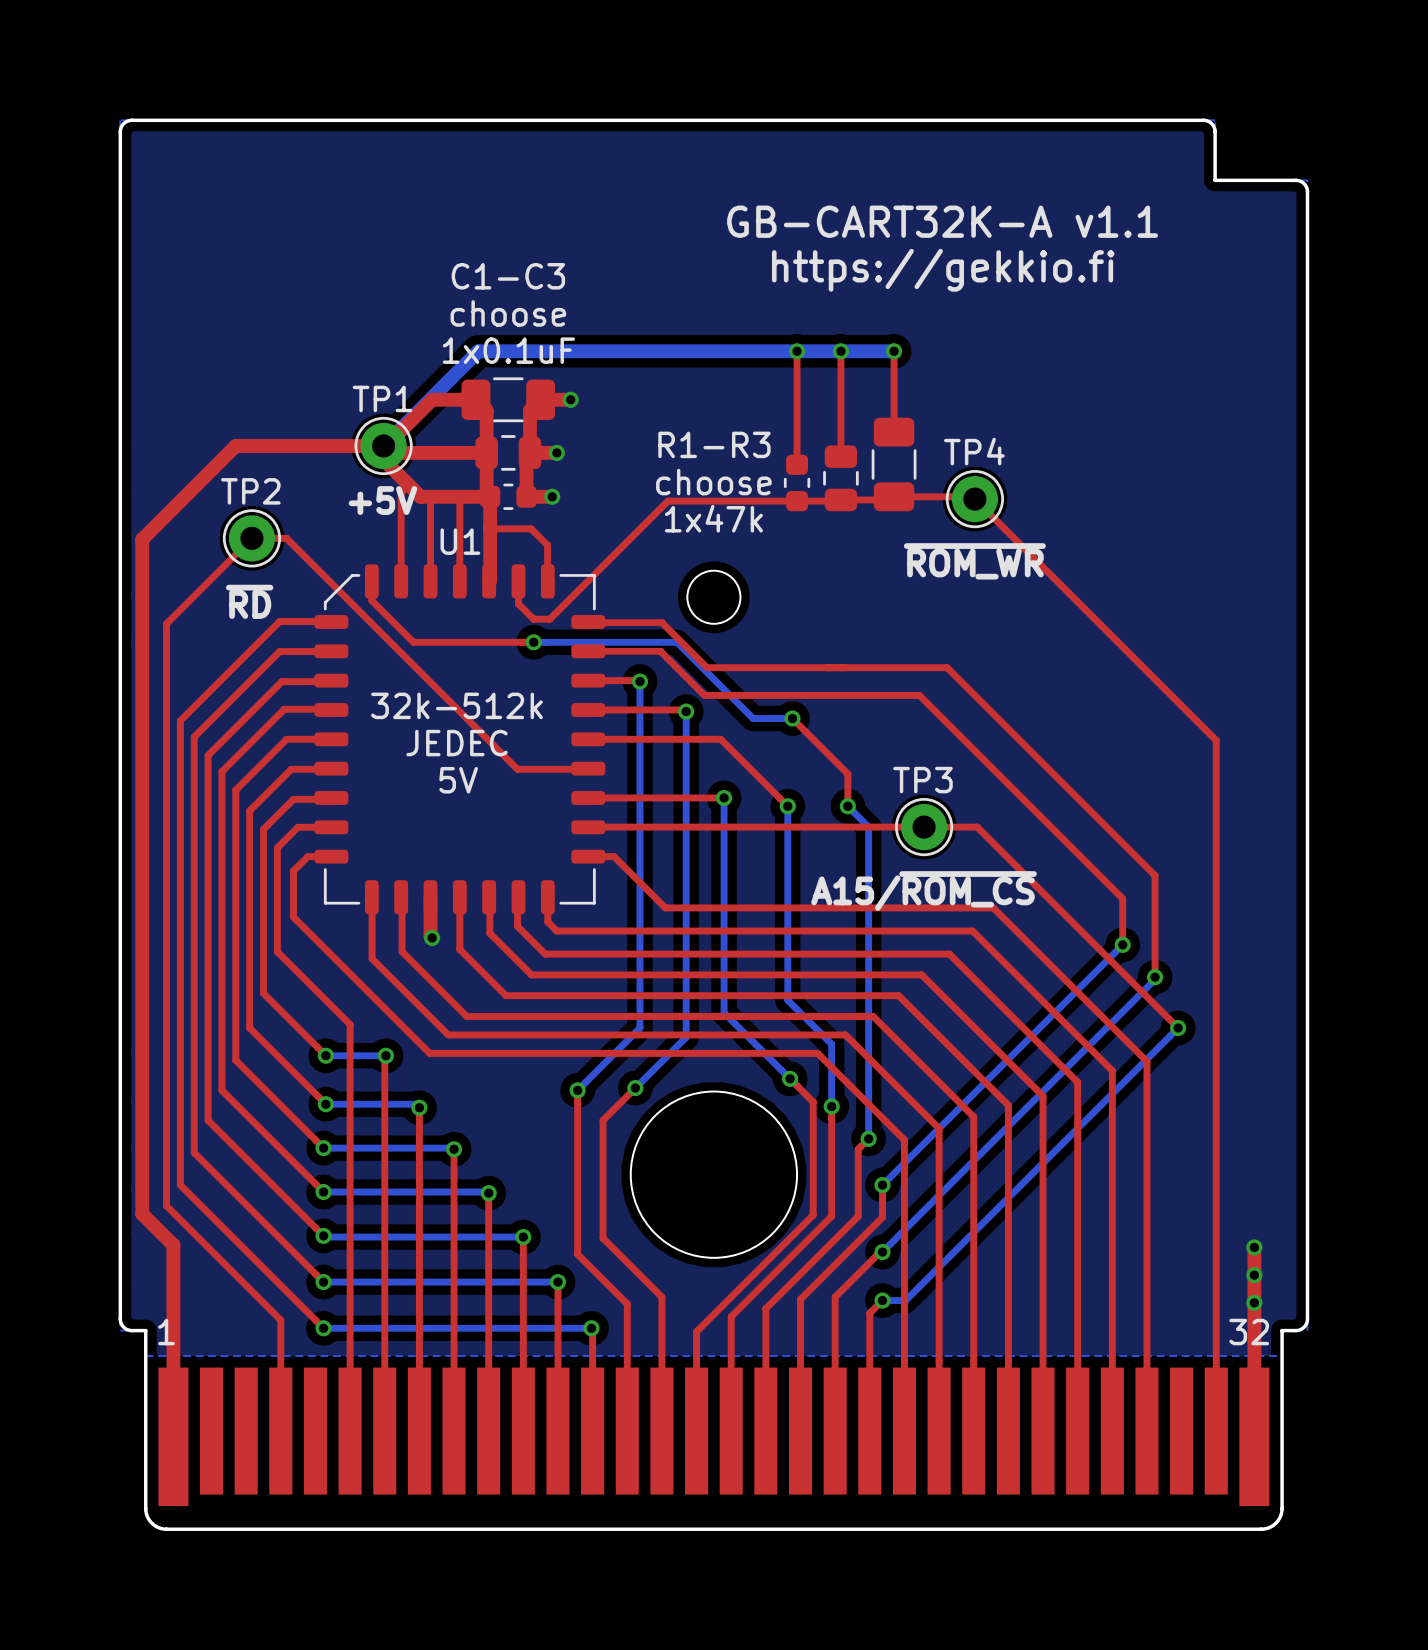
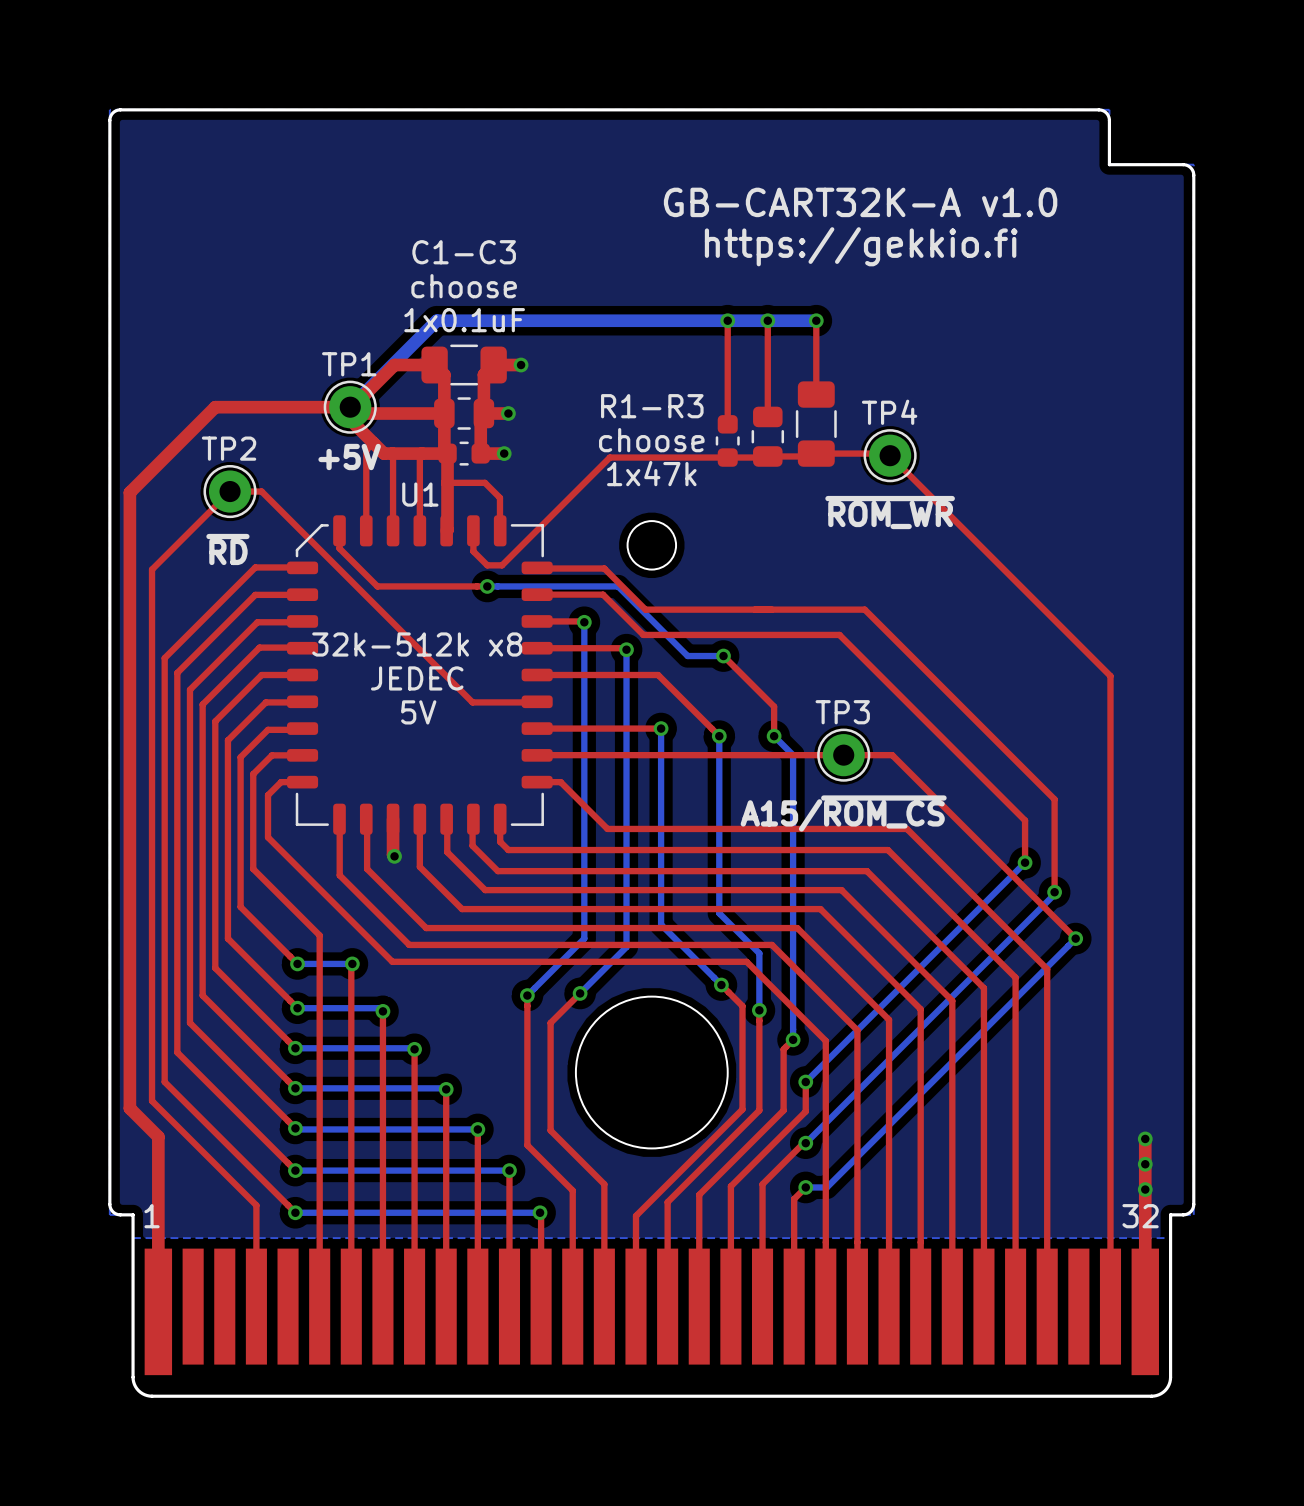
text: GB-CART32K-A v1.1 (942, 221) -> GB-CART32K-A v1.0 (860, 202)
text: 32k-512k (456, 705) -> 32k-512k x8 (417, 644)

